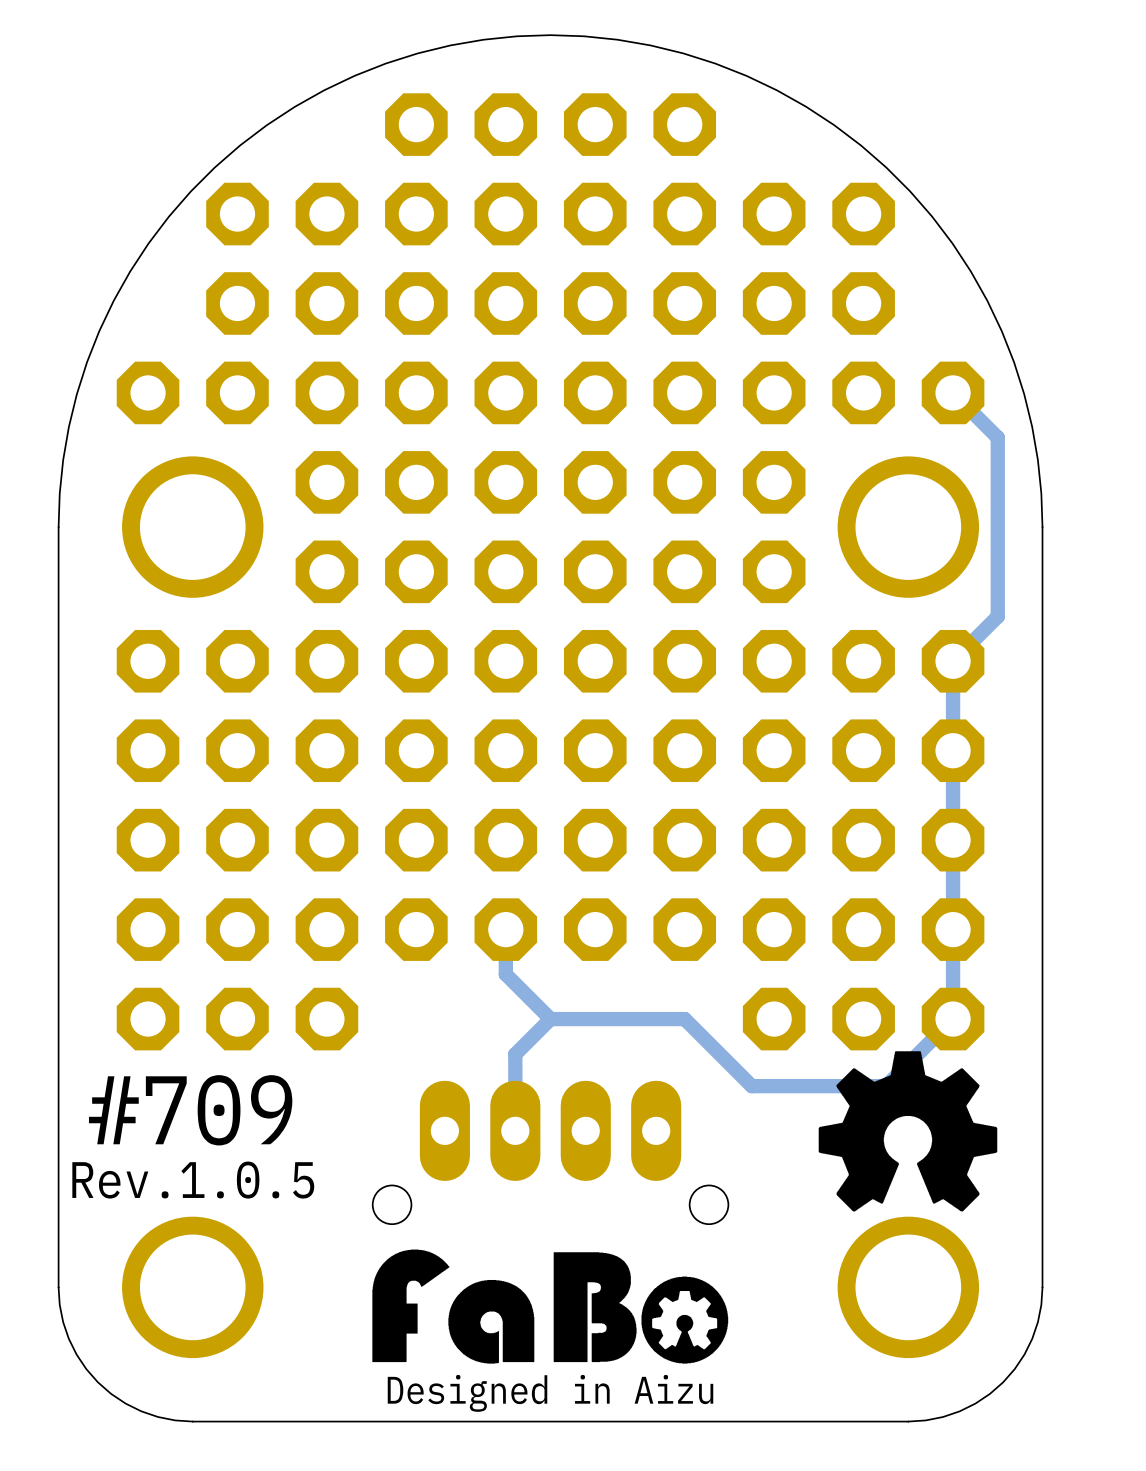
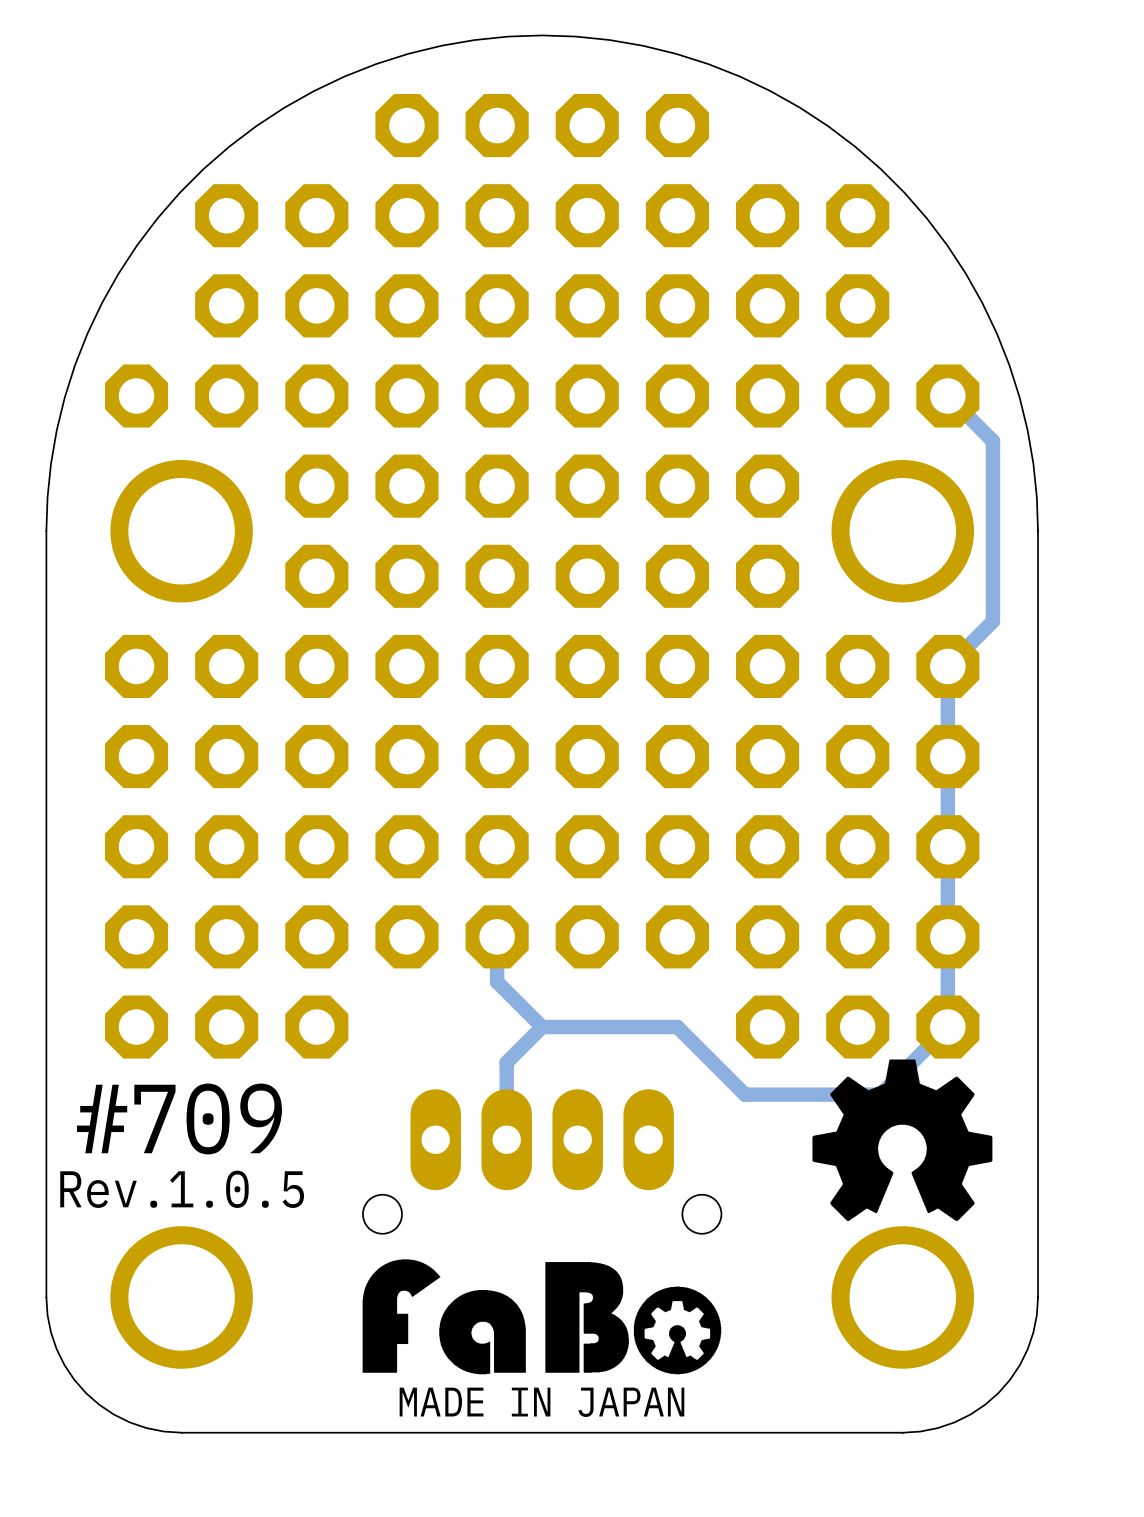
text: Designed in Aizu (550, 1393) -> MADE IN JAPAN (541, 1402)

